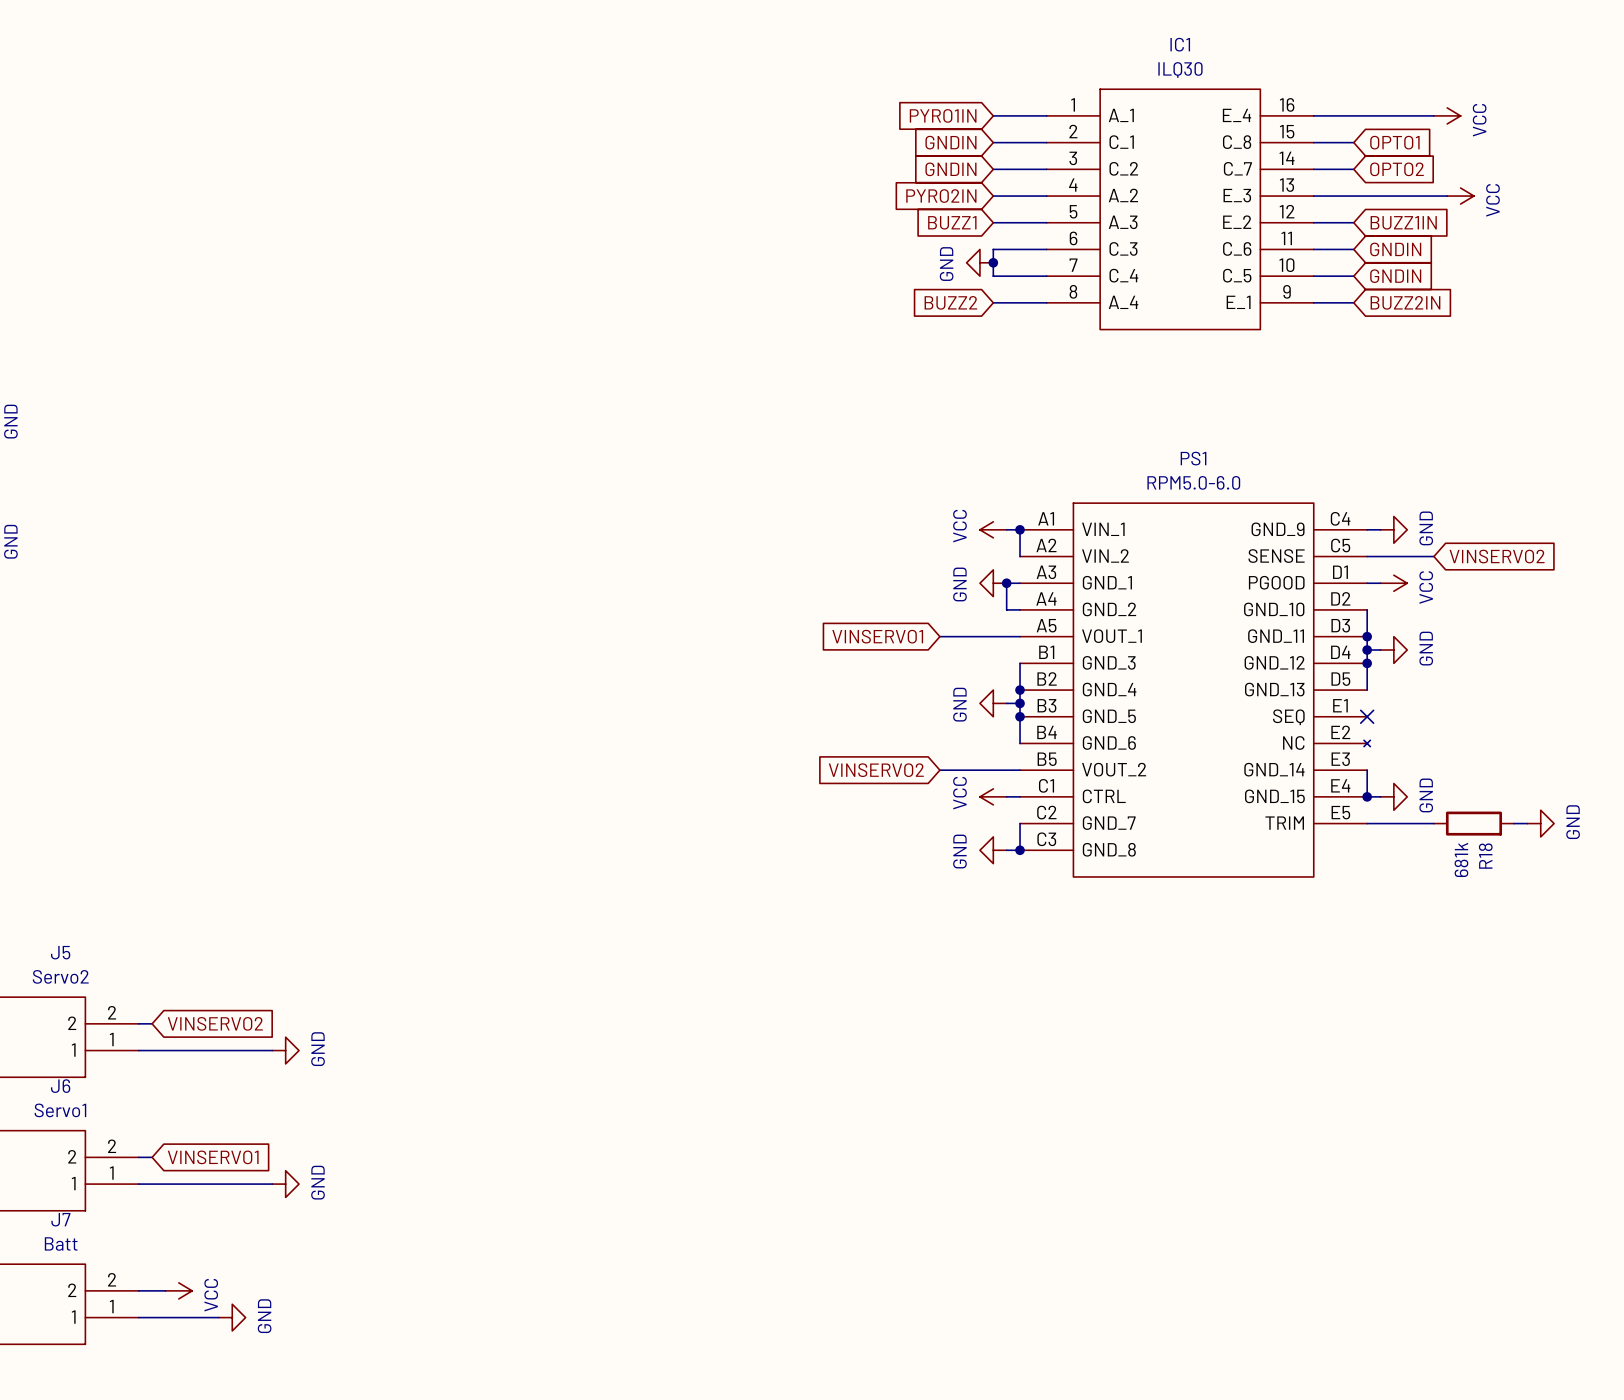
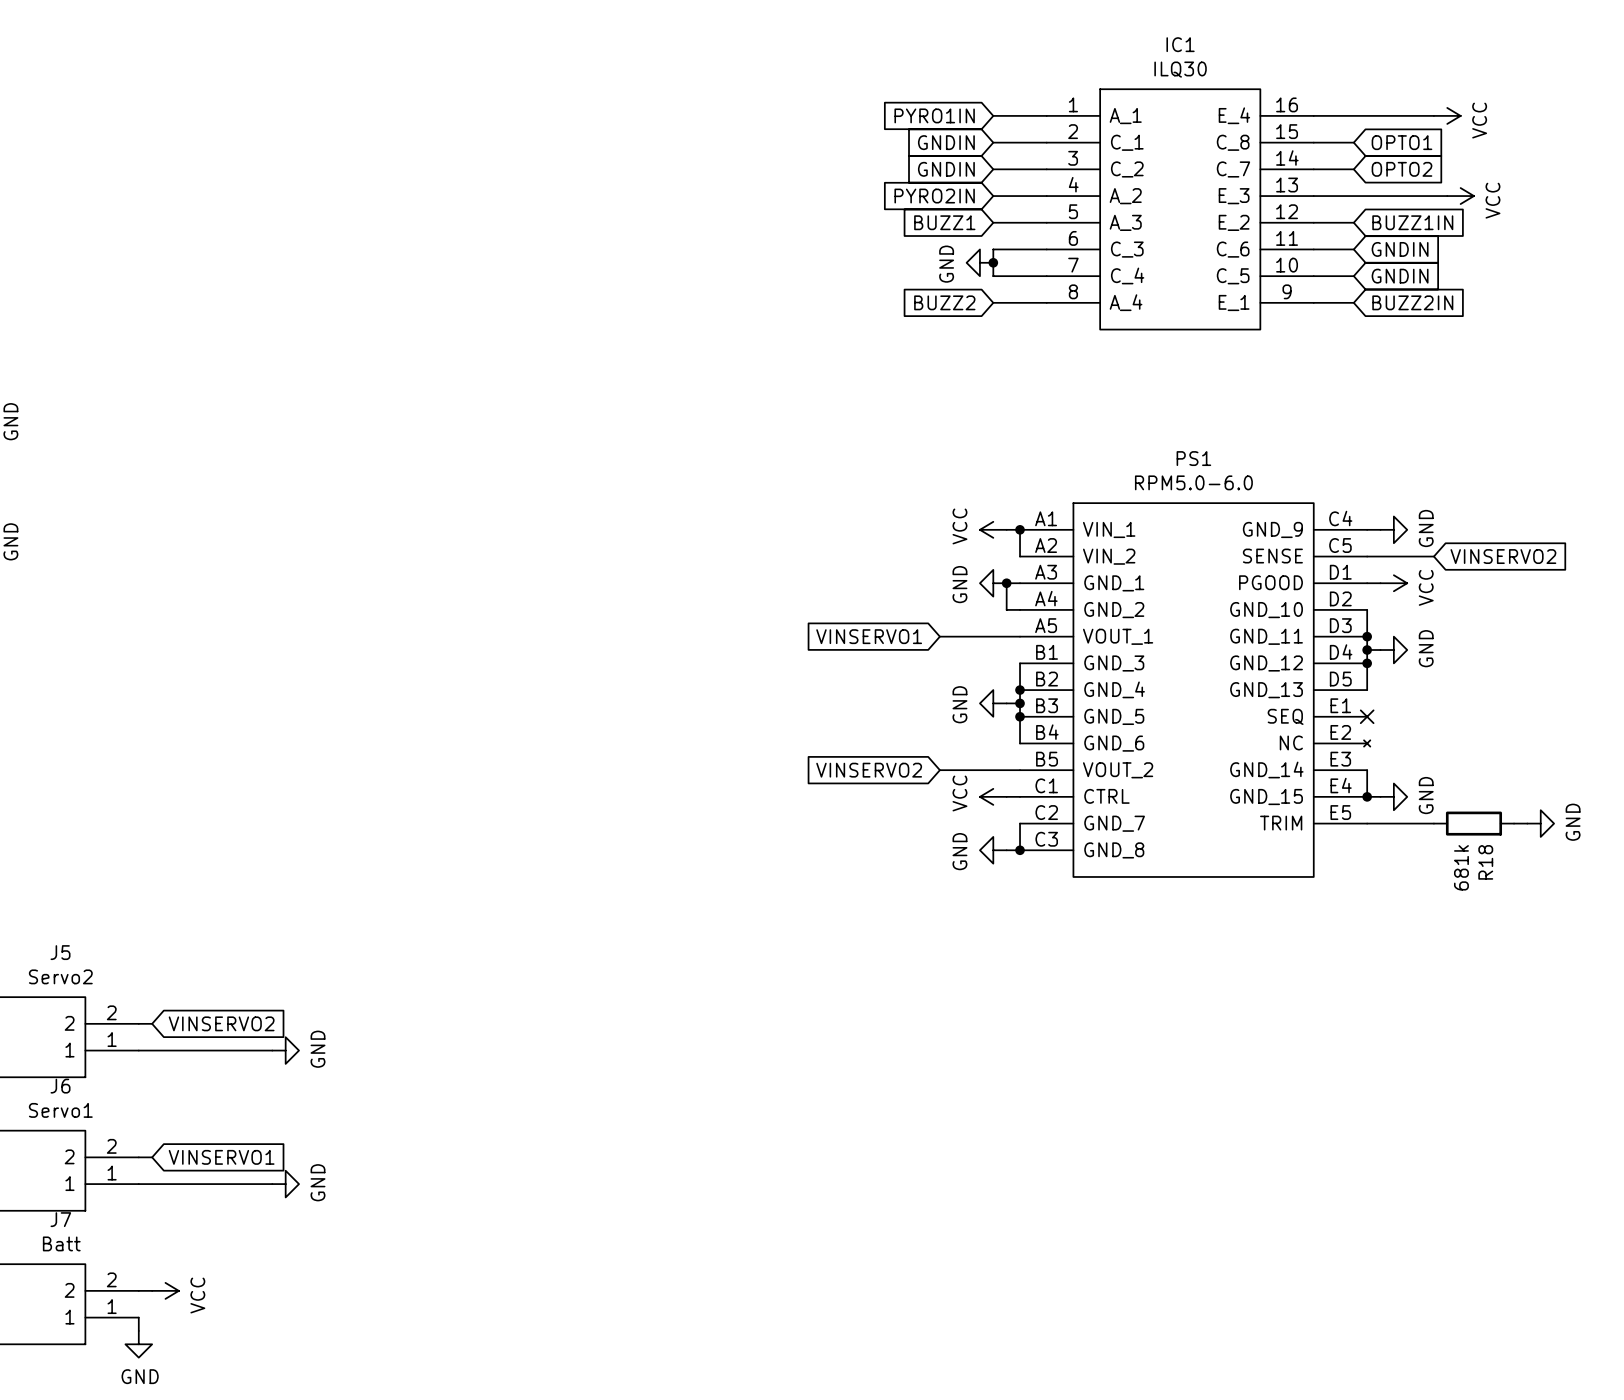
power symbol position: VCC (178, 1290) -> VCC (165, 1290)
wire: (138, 1317) (218, 1317) -> (138, 1317) (138, 1330)
power symbol rotation: 0° (232, 1317) -> 90° clockwise (138, 1344)
power symbol position: GND (232, 1317) -> GND (138, 1344)

